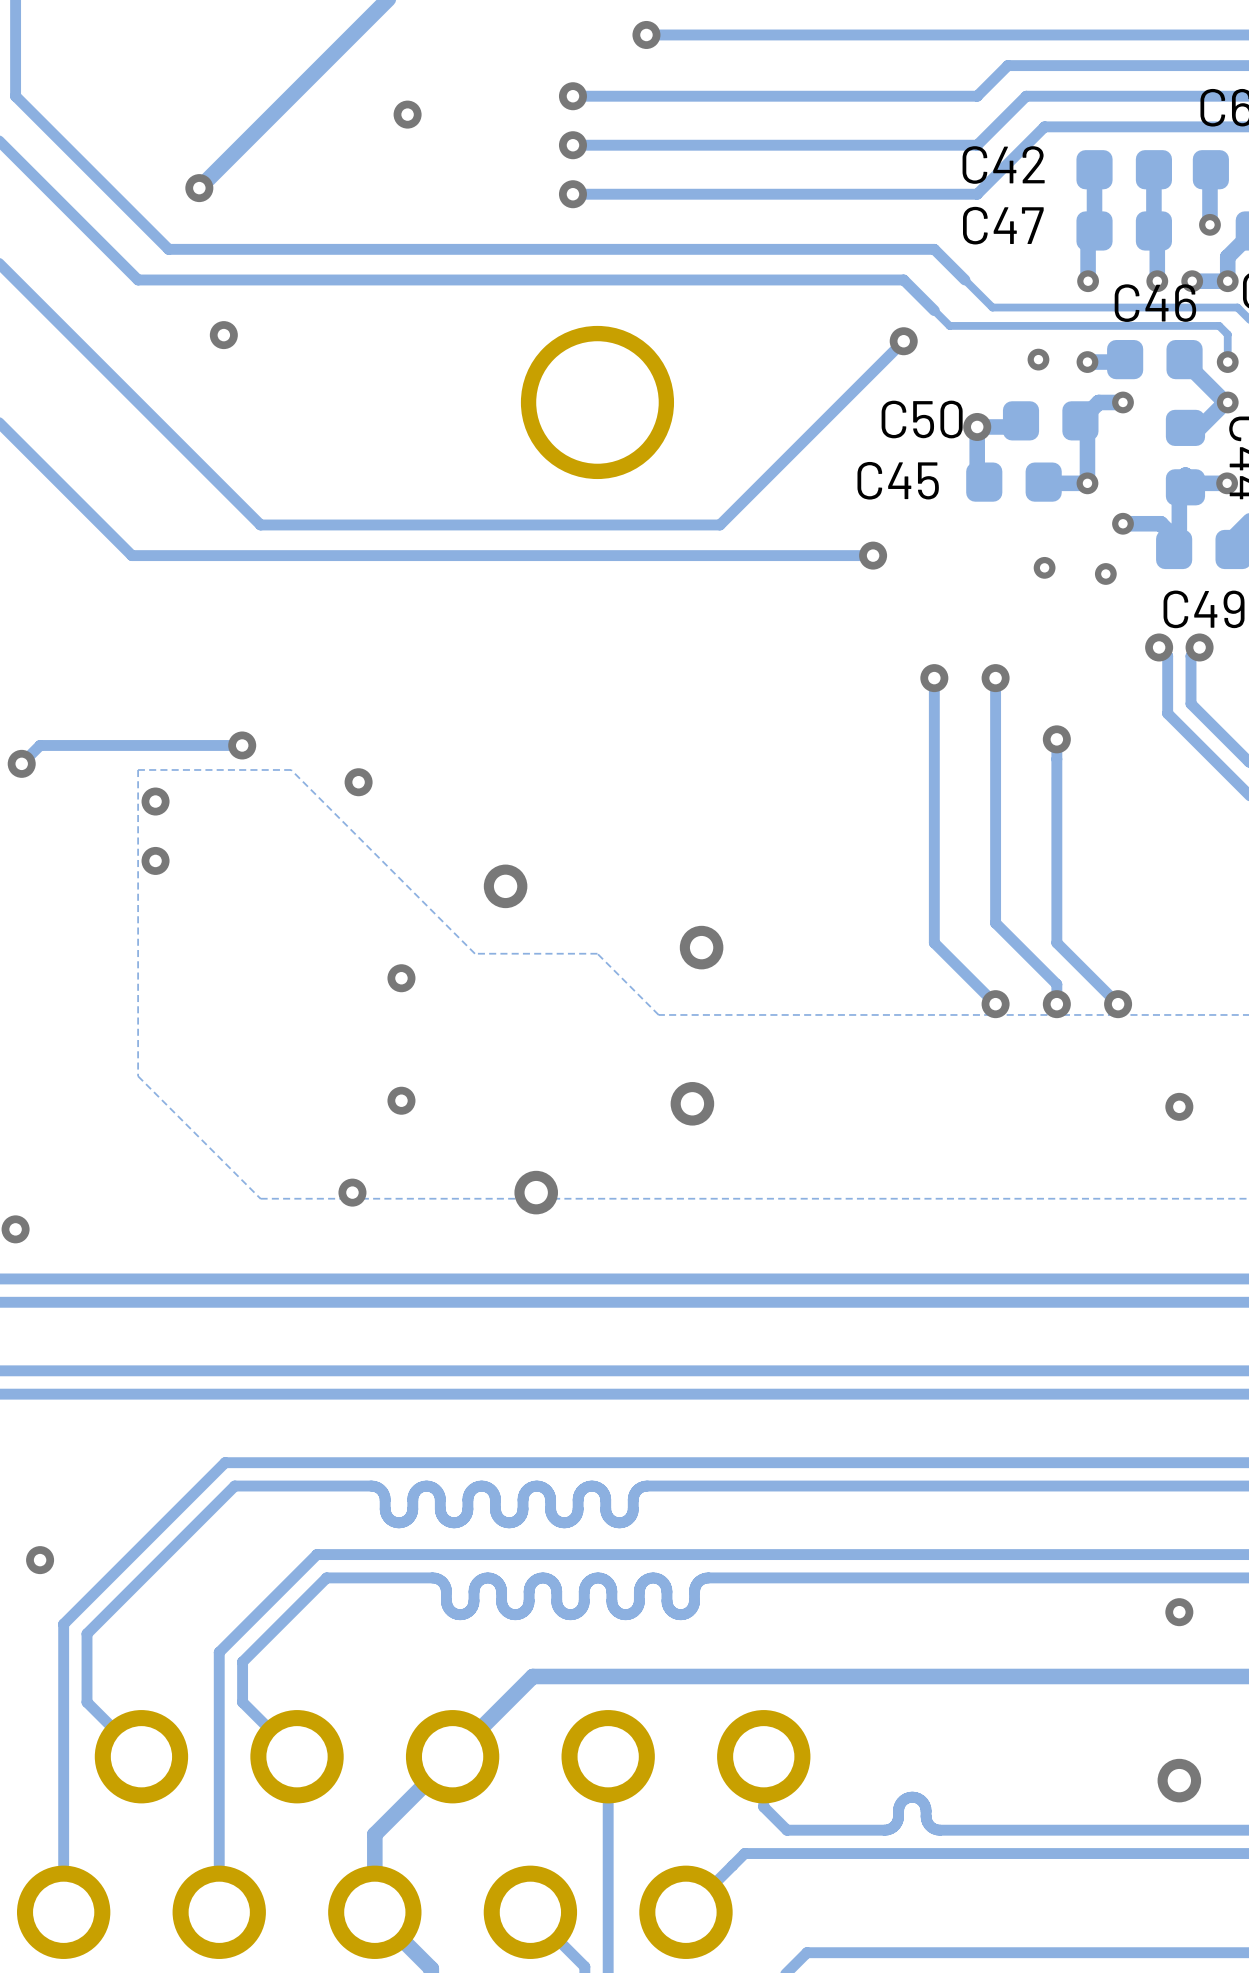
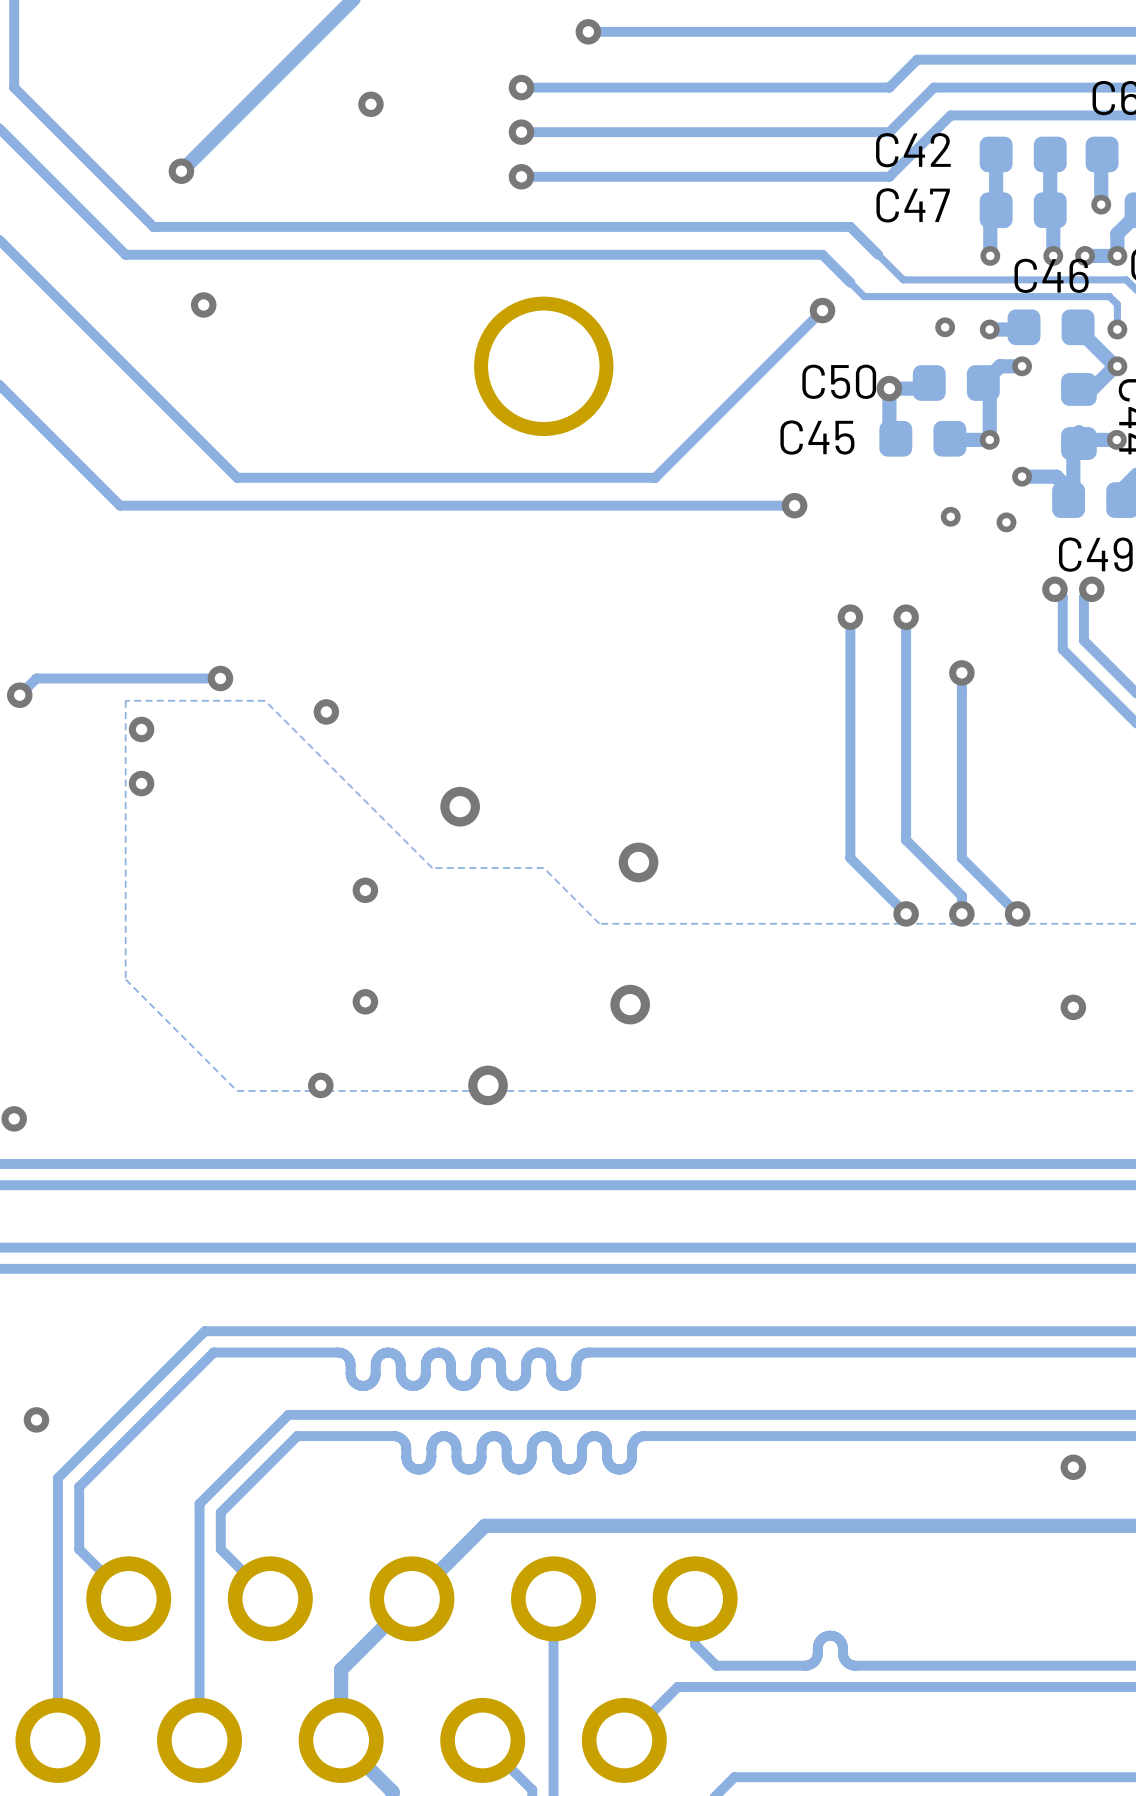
via: (1179, 1780) -> none

